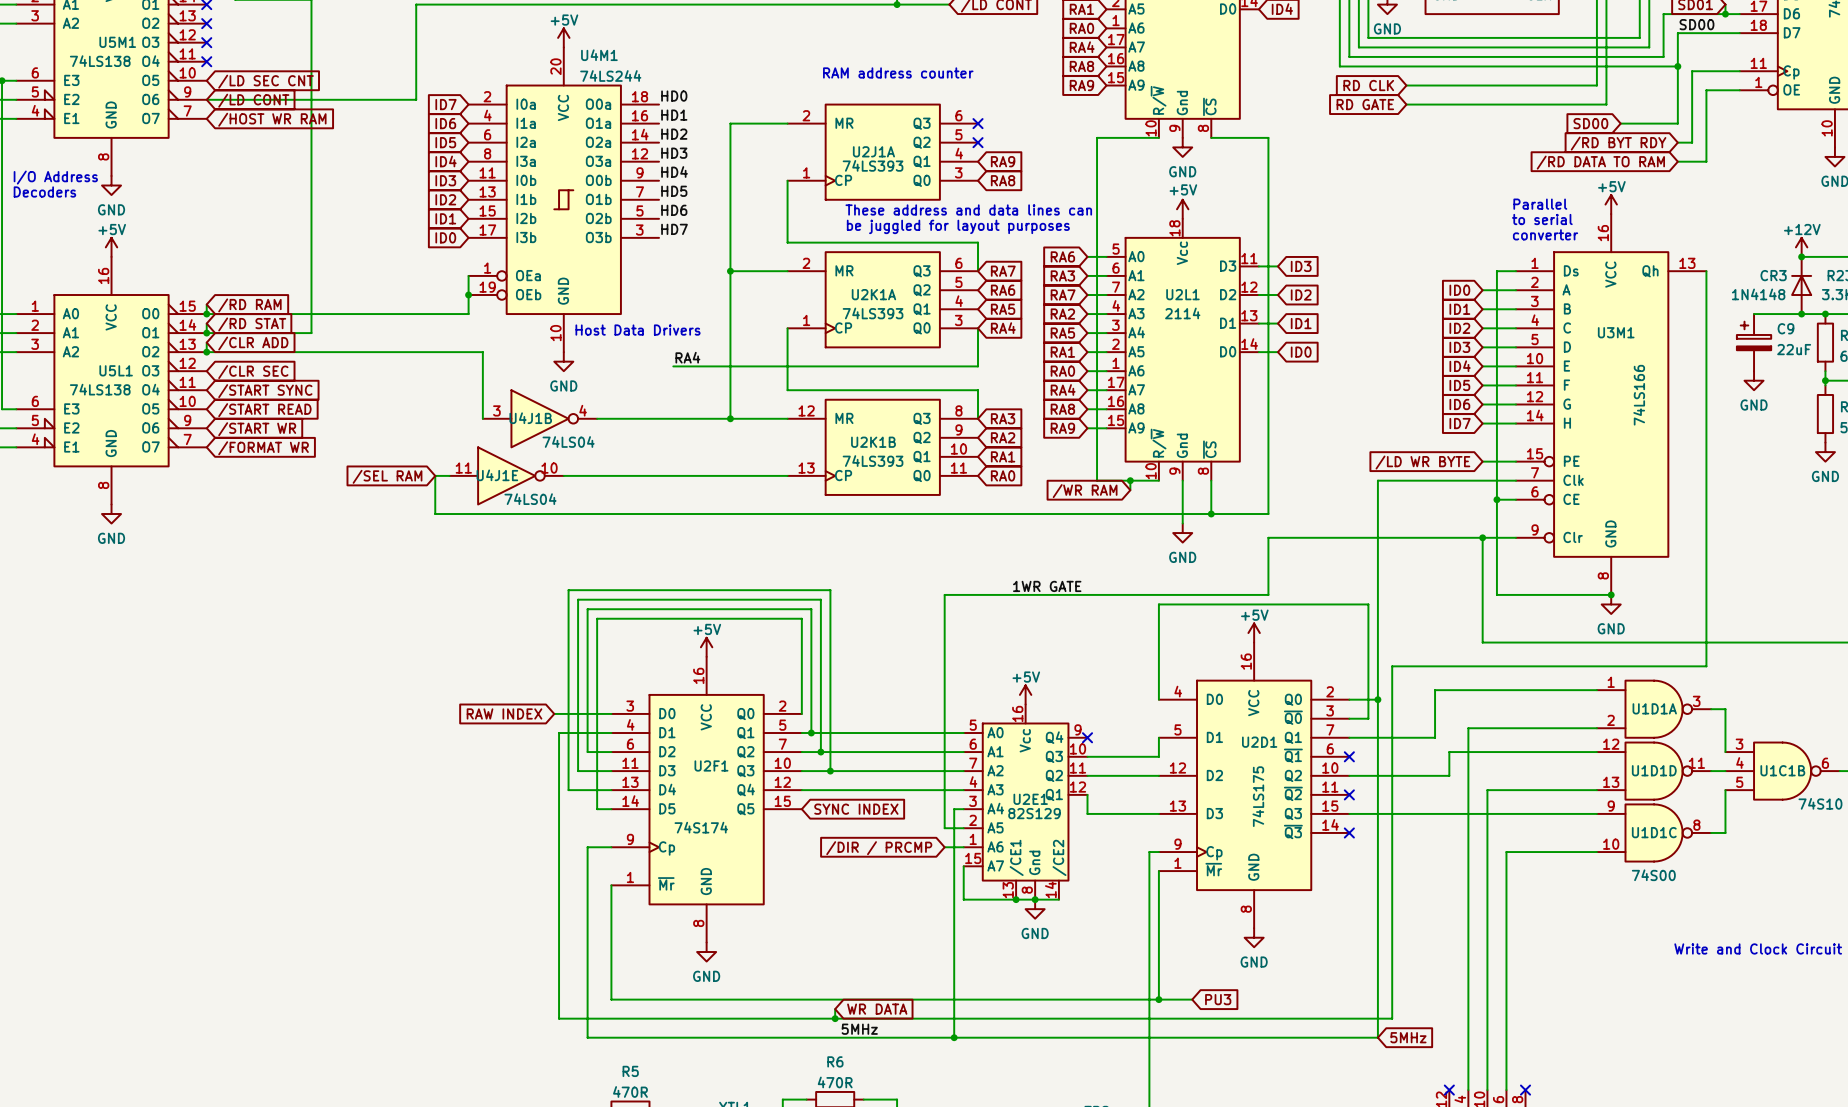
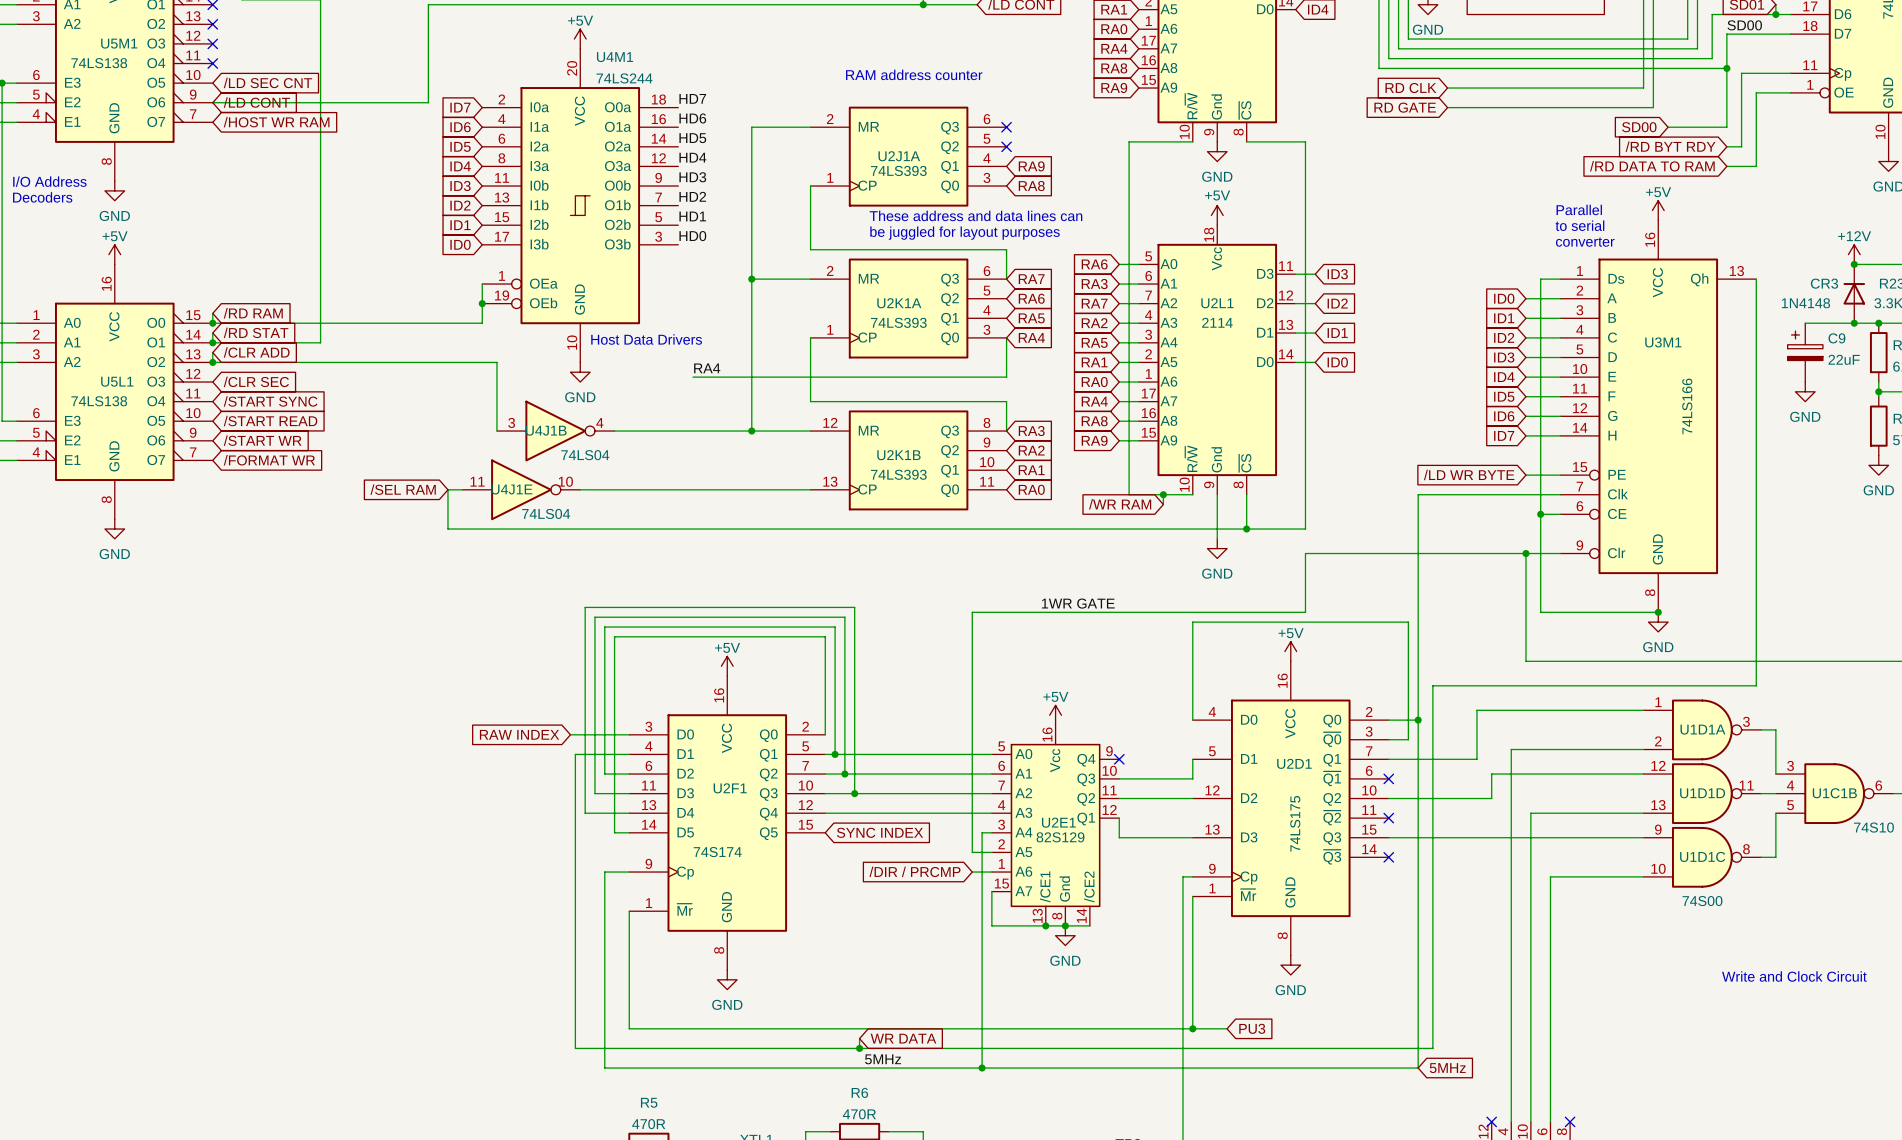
label: HD0 (674, 96) -> HD7 (692, 98)
label: HD1 (674, 115) -> HD6 (692, 118)
label: HD2 (674, 134) -> HD5 (692, 138)
label: HD3 (674, 153) -> HD4 (692, 157)
label: HD4 (674, 172) -> HD3 (692, 177)
label: HD5 (674, 191) -> HD2 (692, 196)
label: HD6 (674, 210) -> HD1 (692, 216)
label: HD7 (674, 229) -> HD0 (692, 236)

